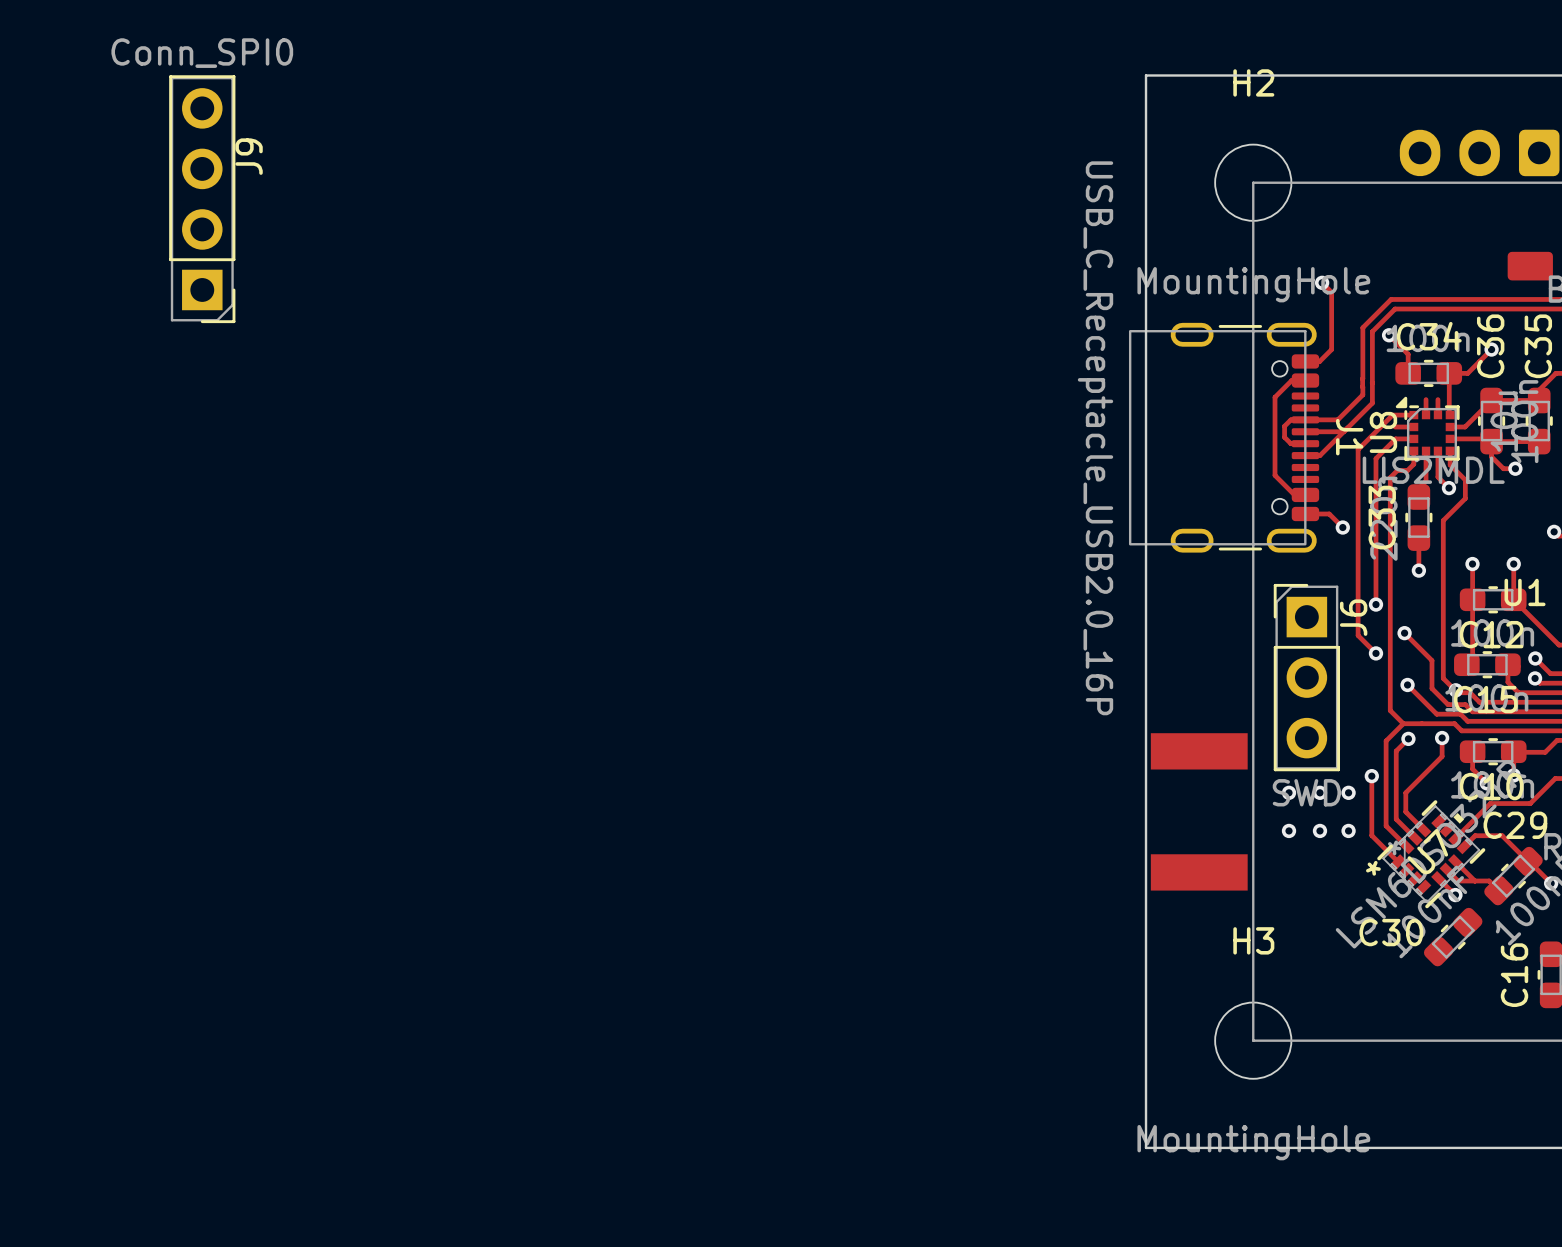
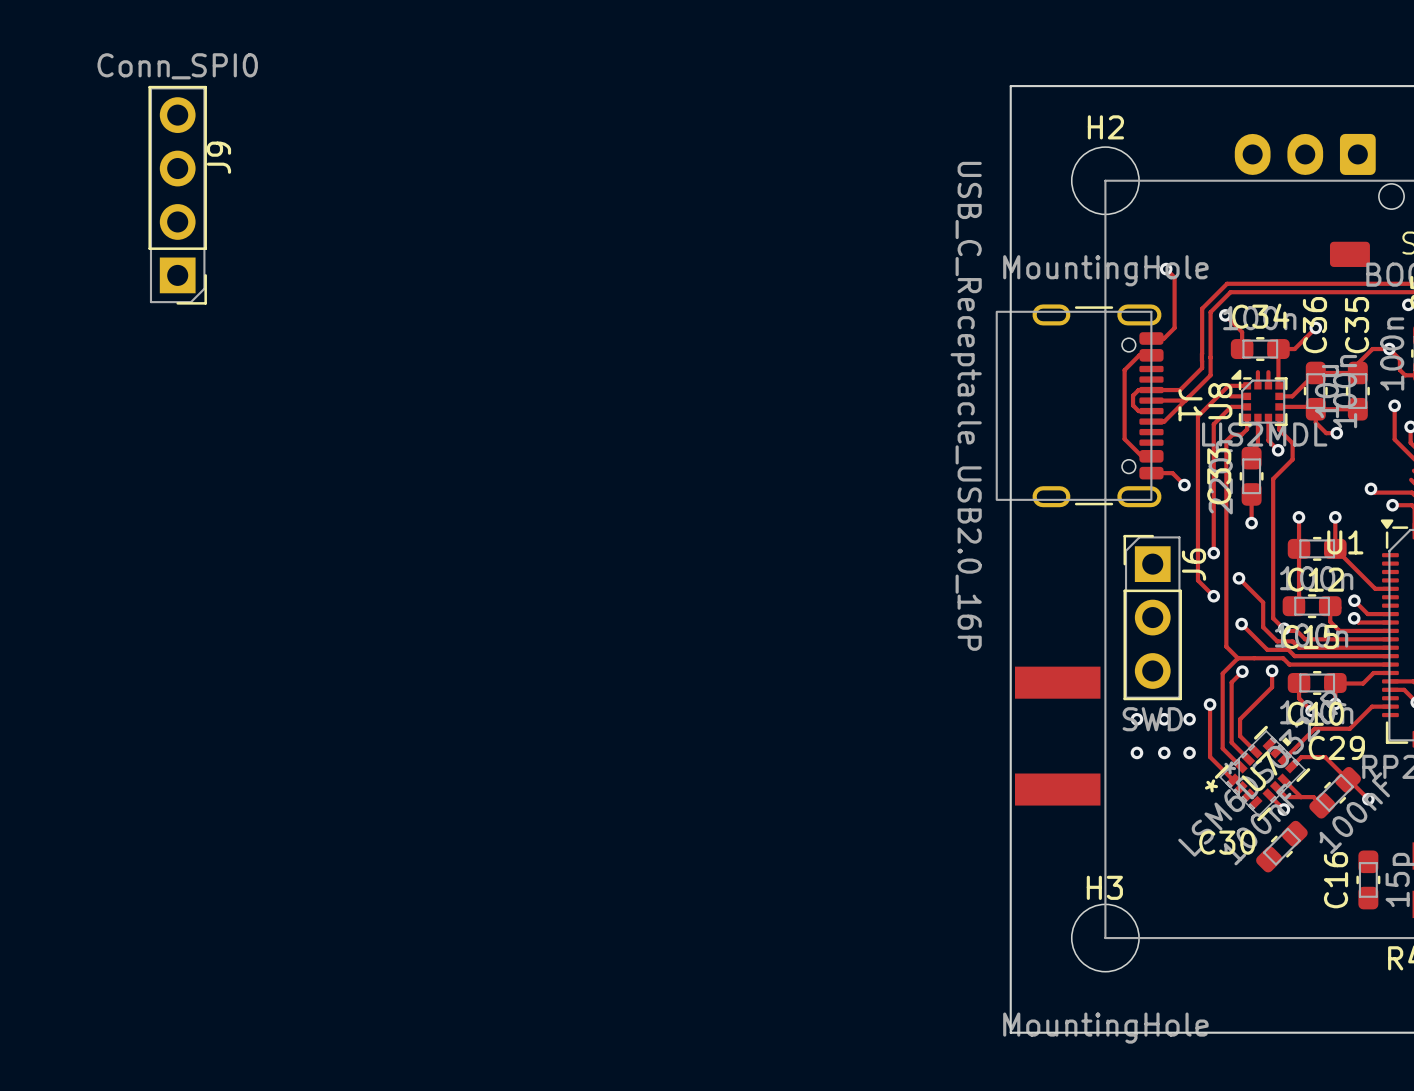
H2 name position: H2 (1253, 82) -> H2 (1105, 127)
H3 name position: H3 (1253, 940) -> H3 (1104, 887)

